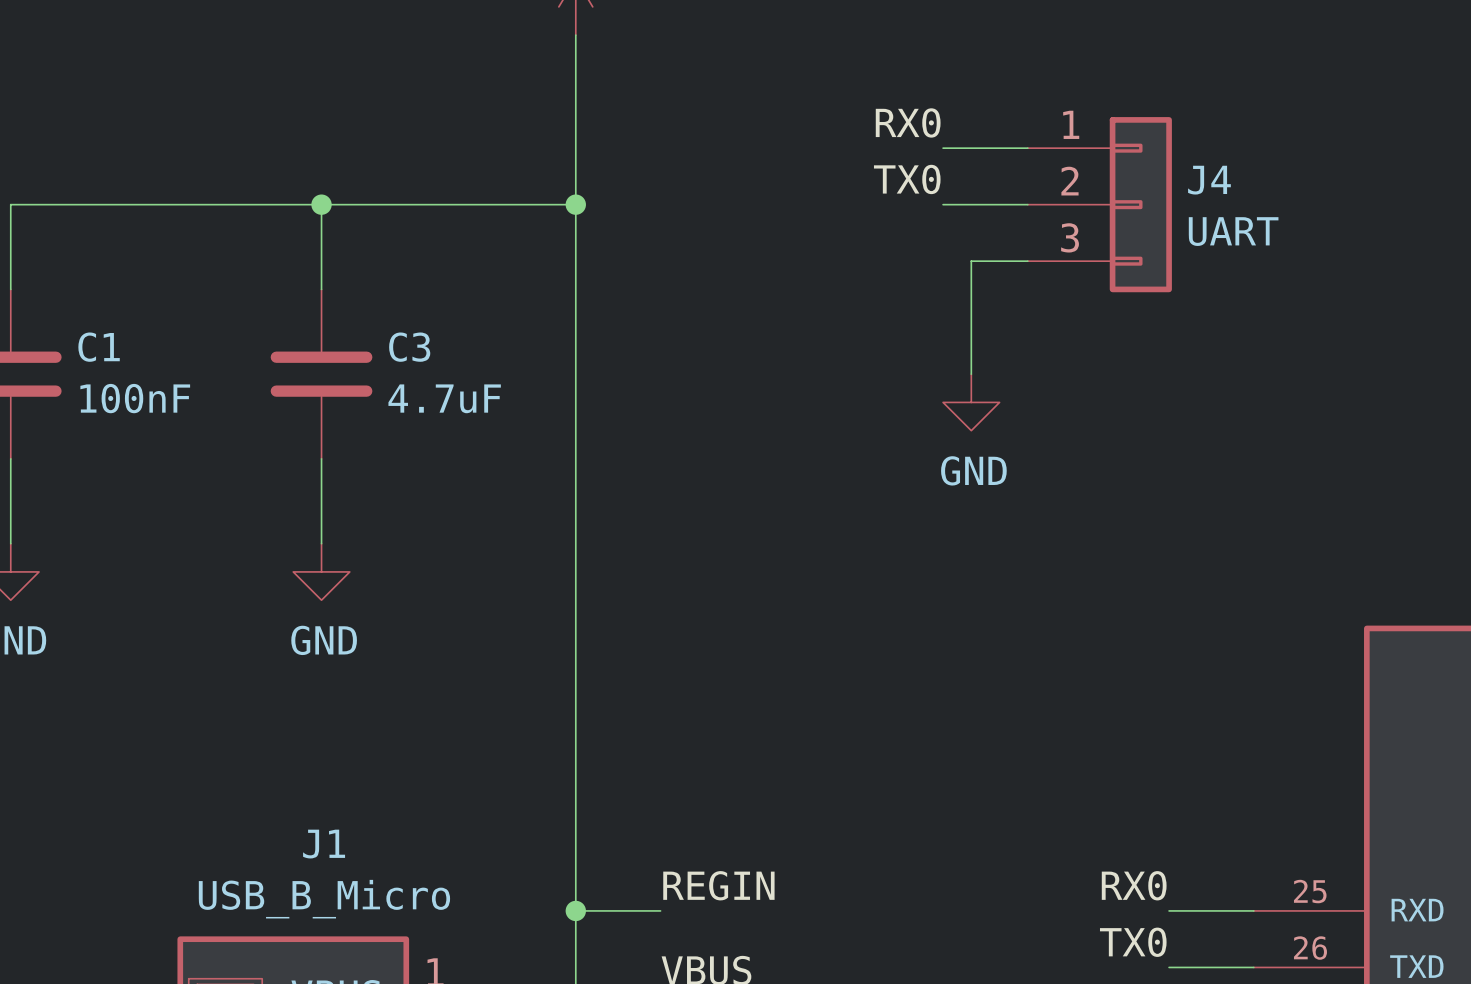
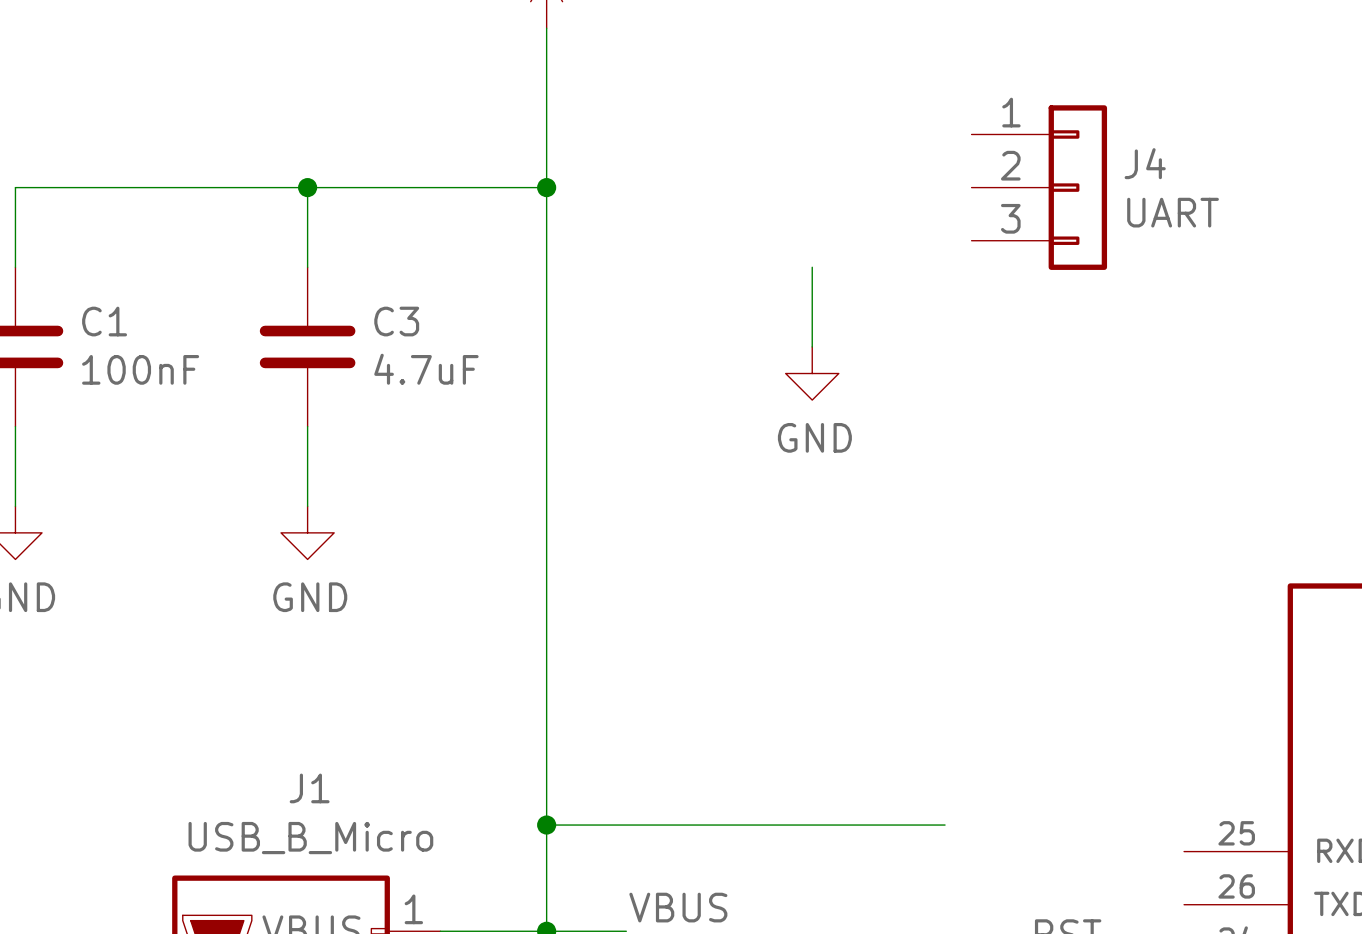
label: RX0 (908, 122) -> none
wire: (943, 148) (1027, 148) -> none
label: TX0 (907, 179) -> none
wire: (943, 204) (1027, 204) -> none
wire: (1027, 261) (971, 261) (971, 374) -> none
wire: none -> (812, 267) (812, 346)
power symbol position: GND (971, 402) -> GND (812, 373)
wire: none -> (546, 825) (945, 825)
label: REGIN (718, 885) -> none
label: RX0 (1134, 885) -> none
wire: (575, 910) (660, 910) -> none
junction position: (575, 910) -> (546, 825)
wire: (1169, 910) (1253, 910) -> none
label: TX0 (1133, 942) -> none
wire: (1169, 967) (1253, 967) -> none

